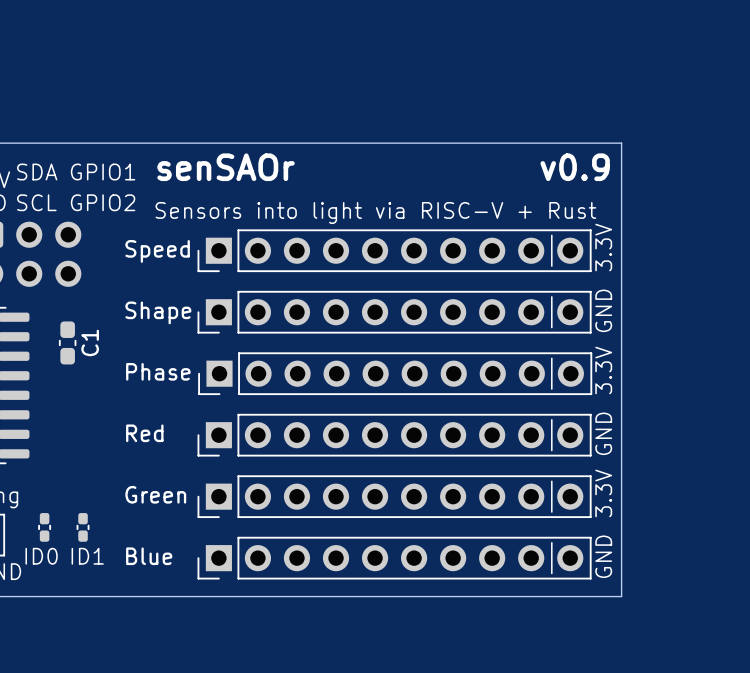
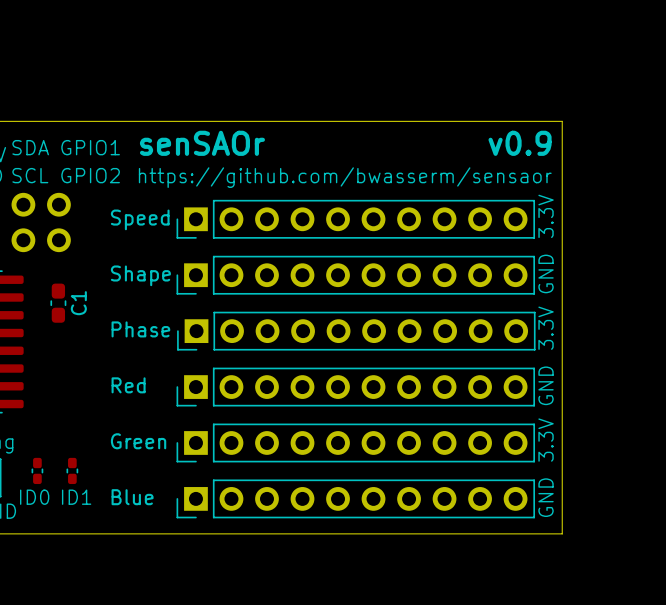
text: none -> https://github.com/bwasserm/sensaor (345, 177)
text: Sensors into light via RISC-V + Rust (375, 212) -> none
line: (551, 235) (551, 266) -> none
line: (551, 296) (551, 327) -> none
line: (551, 358) (551, 389) -> none
line: (551, 419) (551, 450) -> none
line: (551, 481) (551, 512) -> none
line: (551, 542) (551, 573) -> none

